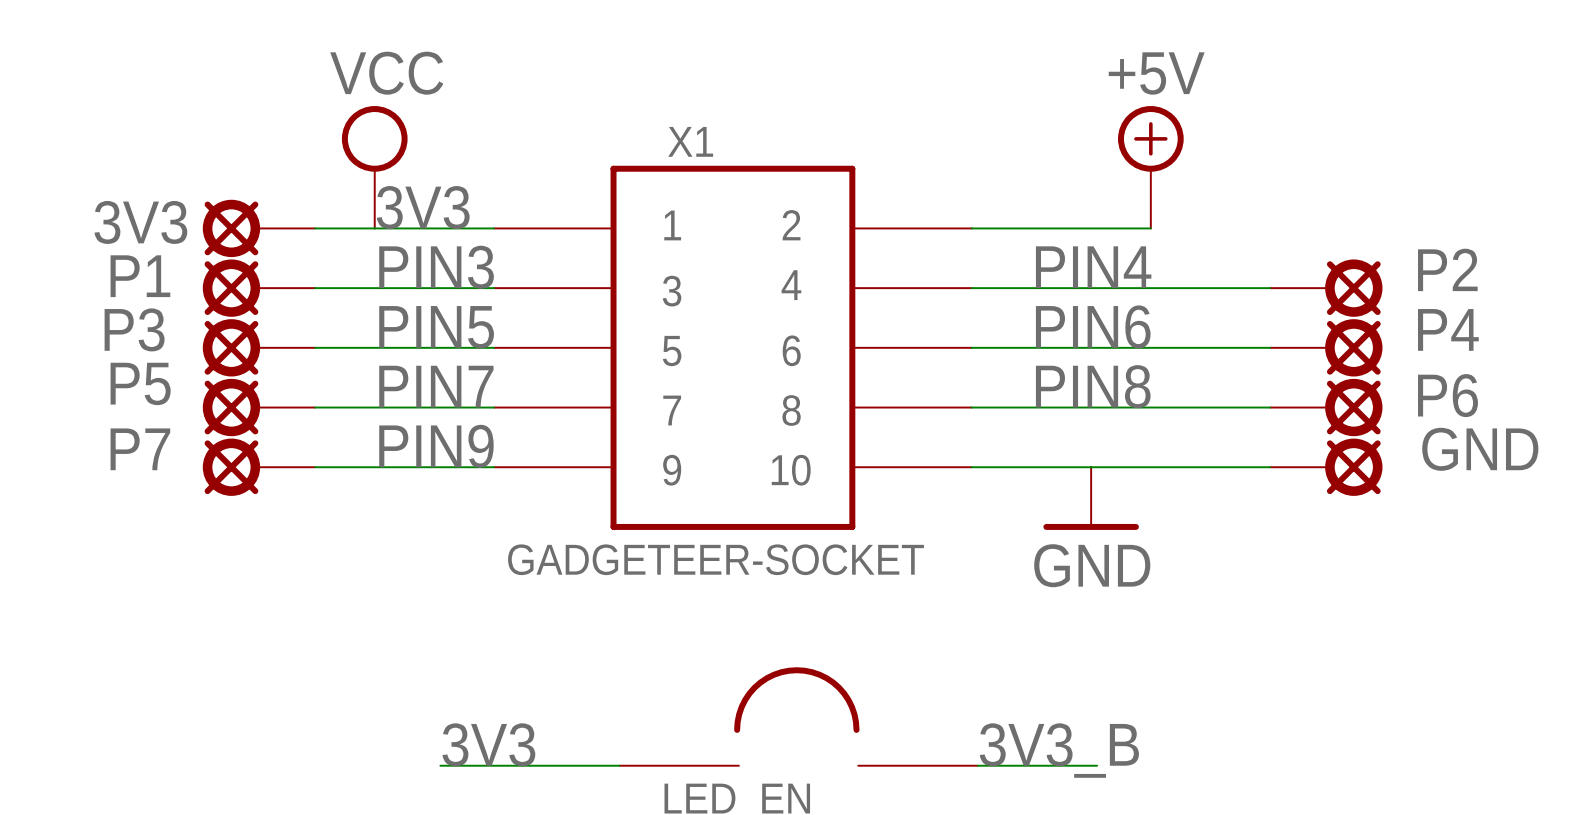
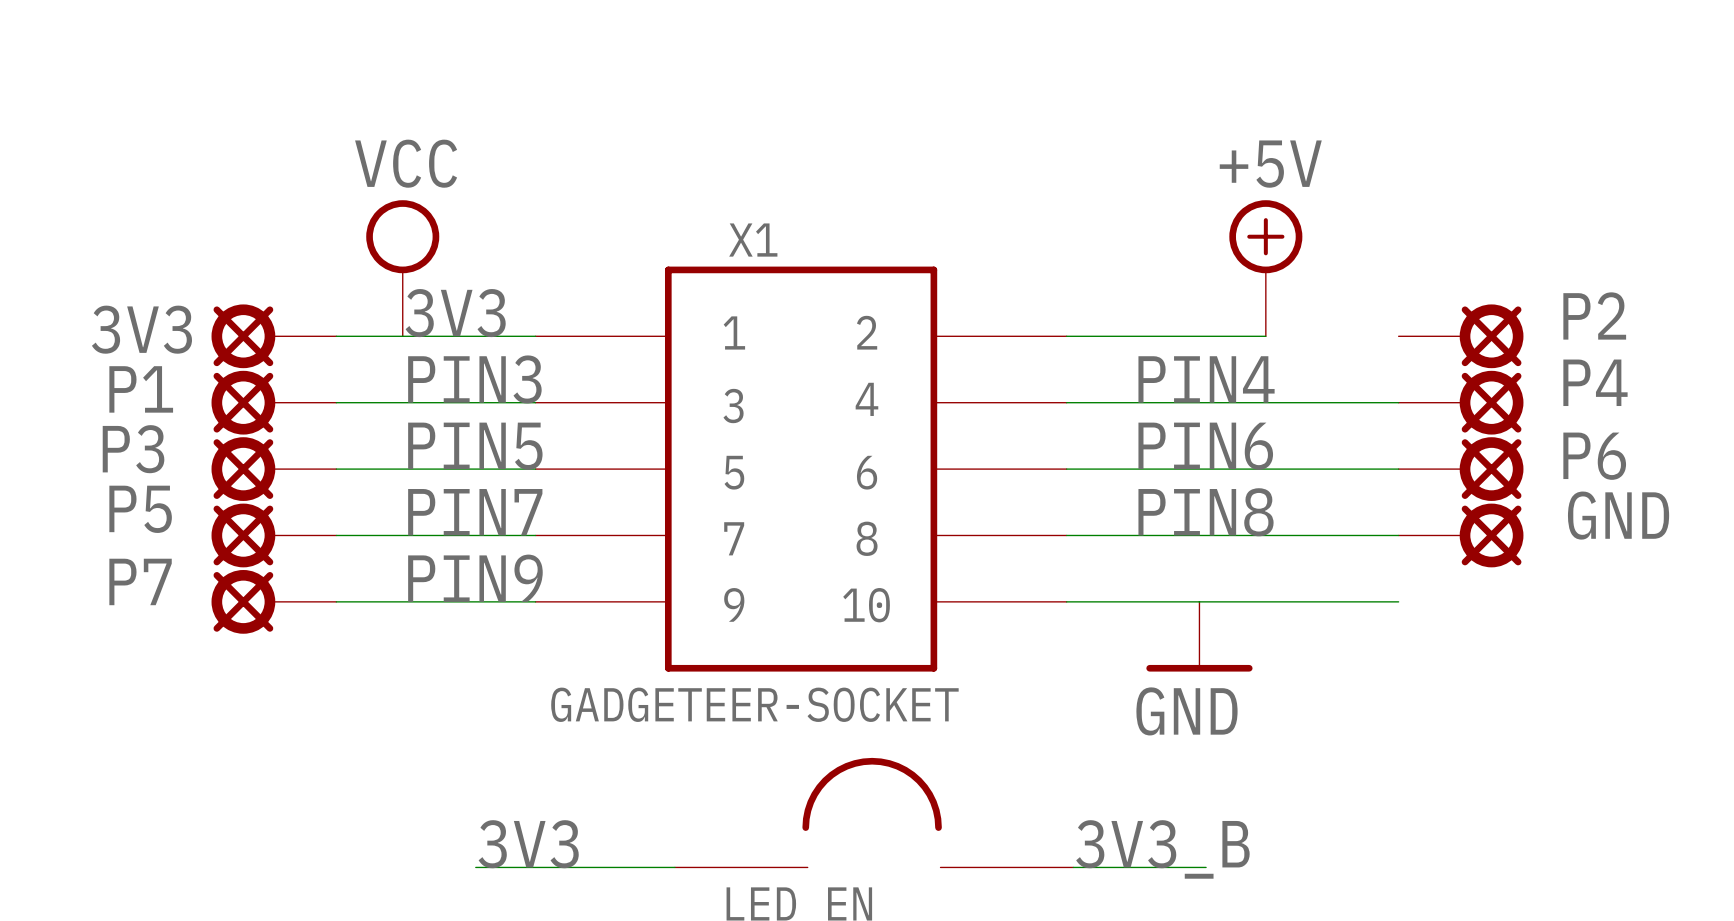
power symbol position: VCC (374, 167) -> VCC (402, 268)
power symbol position: +5V (1150, 167) -> +5V (1265, 268)
label: 3V3 (423, 207) -> none
3V3: (258, 228) -> none
wire: (315, 228) (494, 228) -> (336, 601) (535, 601)
wire: (971, 228) (1150, 228) -> none
label: PIN3 (436, 267) -> 3V3 (455, 313)
label: PIN4 (1093, 267) -> none
P1 name: P1 (140, 276) -> 3V3 (141, 329)
wire: (1150, 288) (1270, 288) -> none
label: PIN6 (1093, 326) -> PIN4 (1206, 379)
label: PIN5 (436, 327) -> PIN3 (474, 379)
P3 name: P3 (134, 329) -> P1 (141, 389)
X1 position: (732, 347) -> (801, 469)
P5 name: P5 (140, 383) -> P3 (133, 449)
label: PIN7 (436, 386) -> PIN5 (475, 446)
label: PIN8 (1093, 386) -> PIN6 (1205, 446)
label: PIN9 (436, 446) -> PIN7 (475, 512)
label: none -> PIN8 (1206, 512)
P7 name: P7 (140, 449) -> P5 (140, 509)
power symbol position: GND (1091, 498) -> GND (1199, 636)
label: none -> PIN9 (475, 578)
P7: none -> (273, 601)
wire: none -> (1066, 601) (1398, 601)

